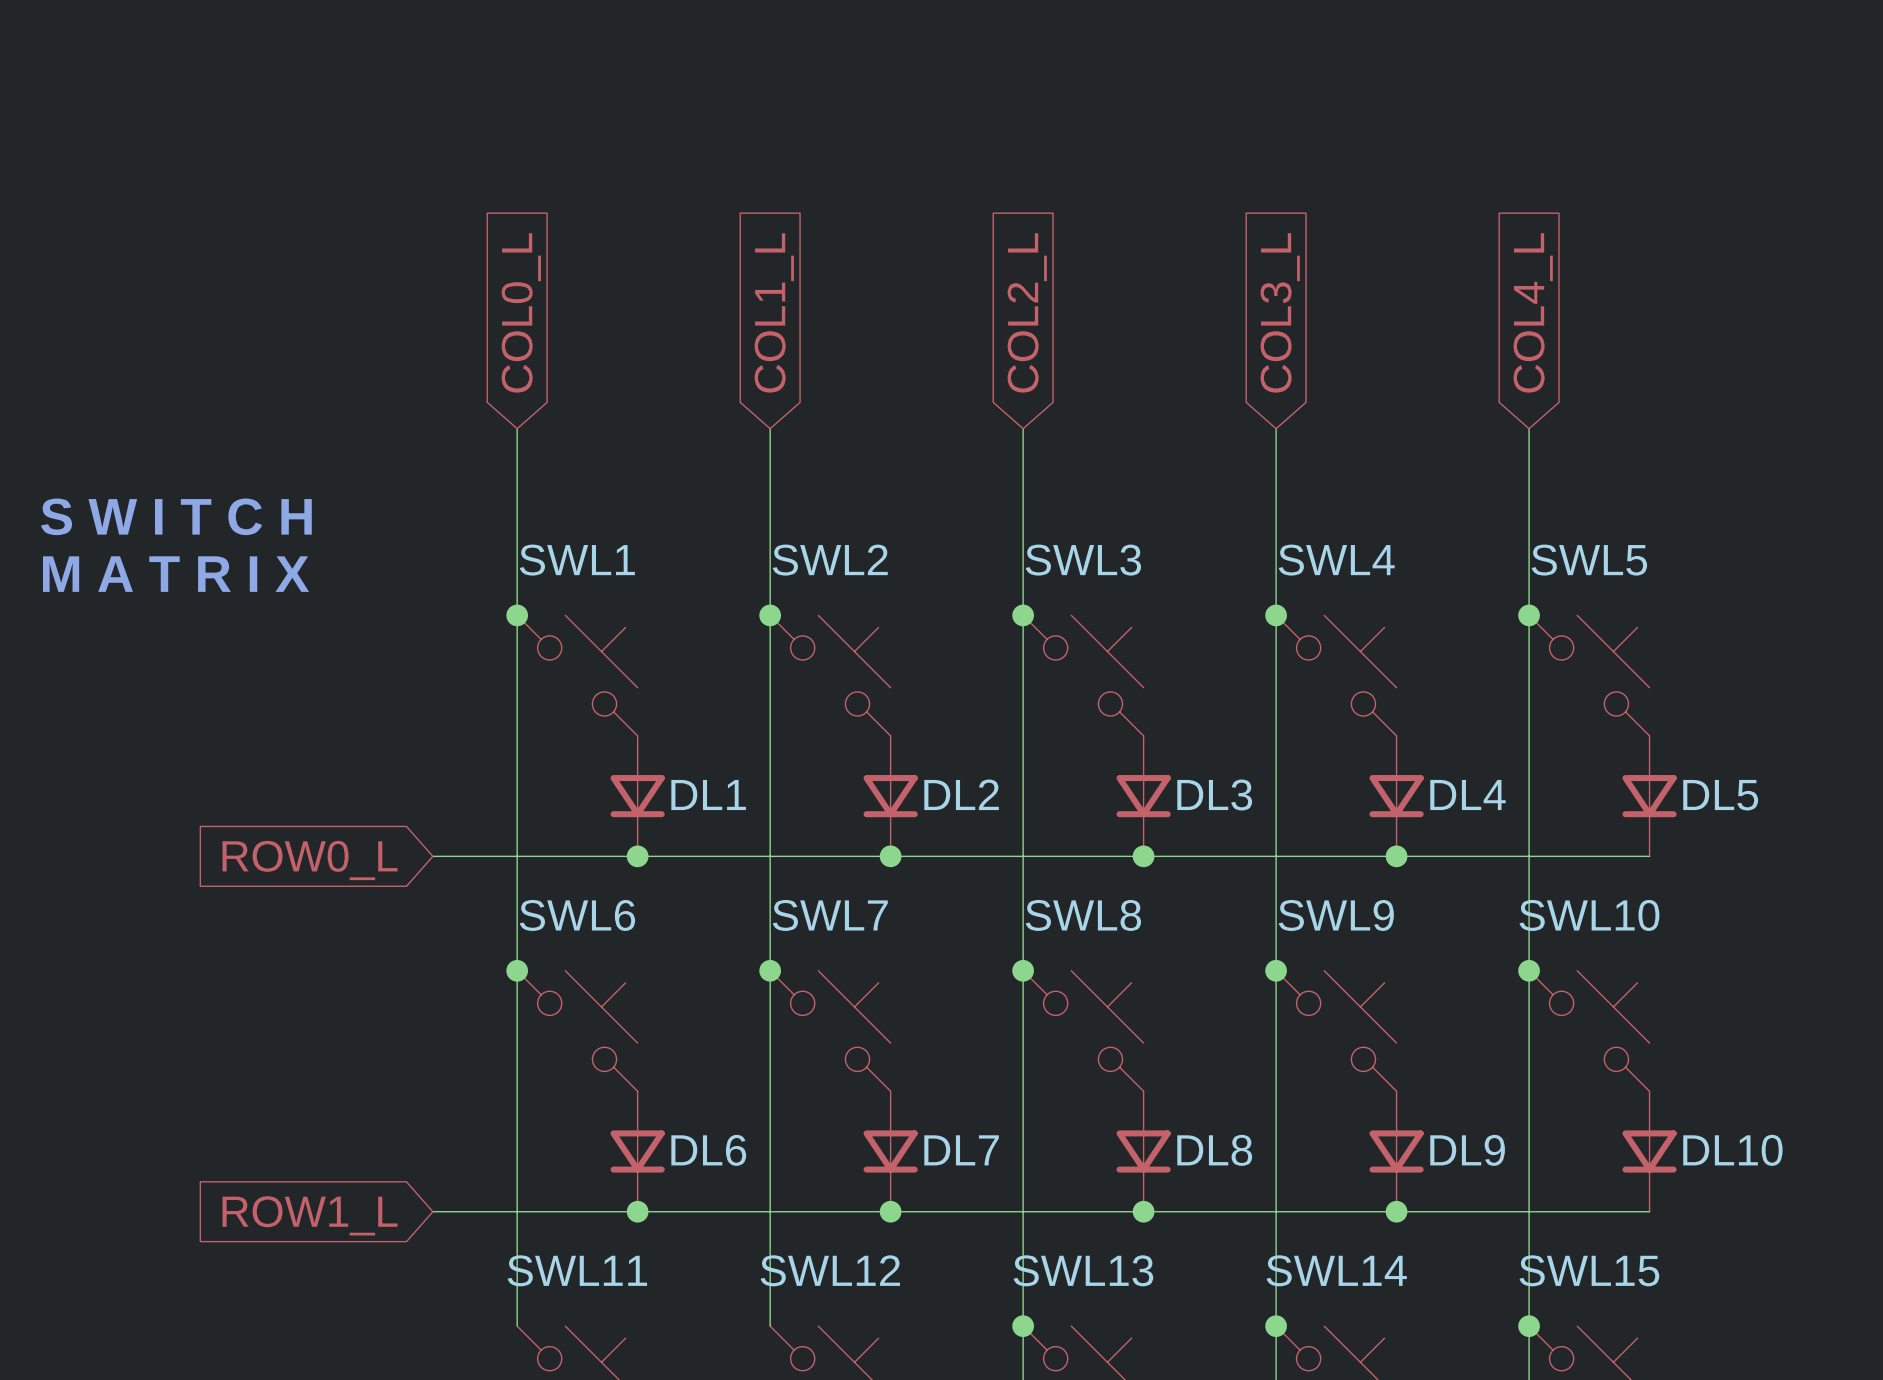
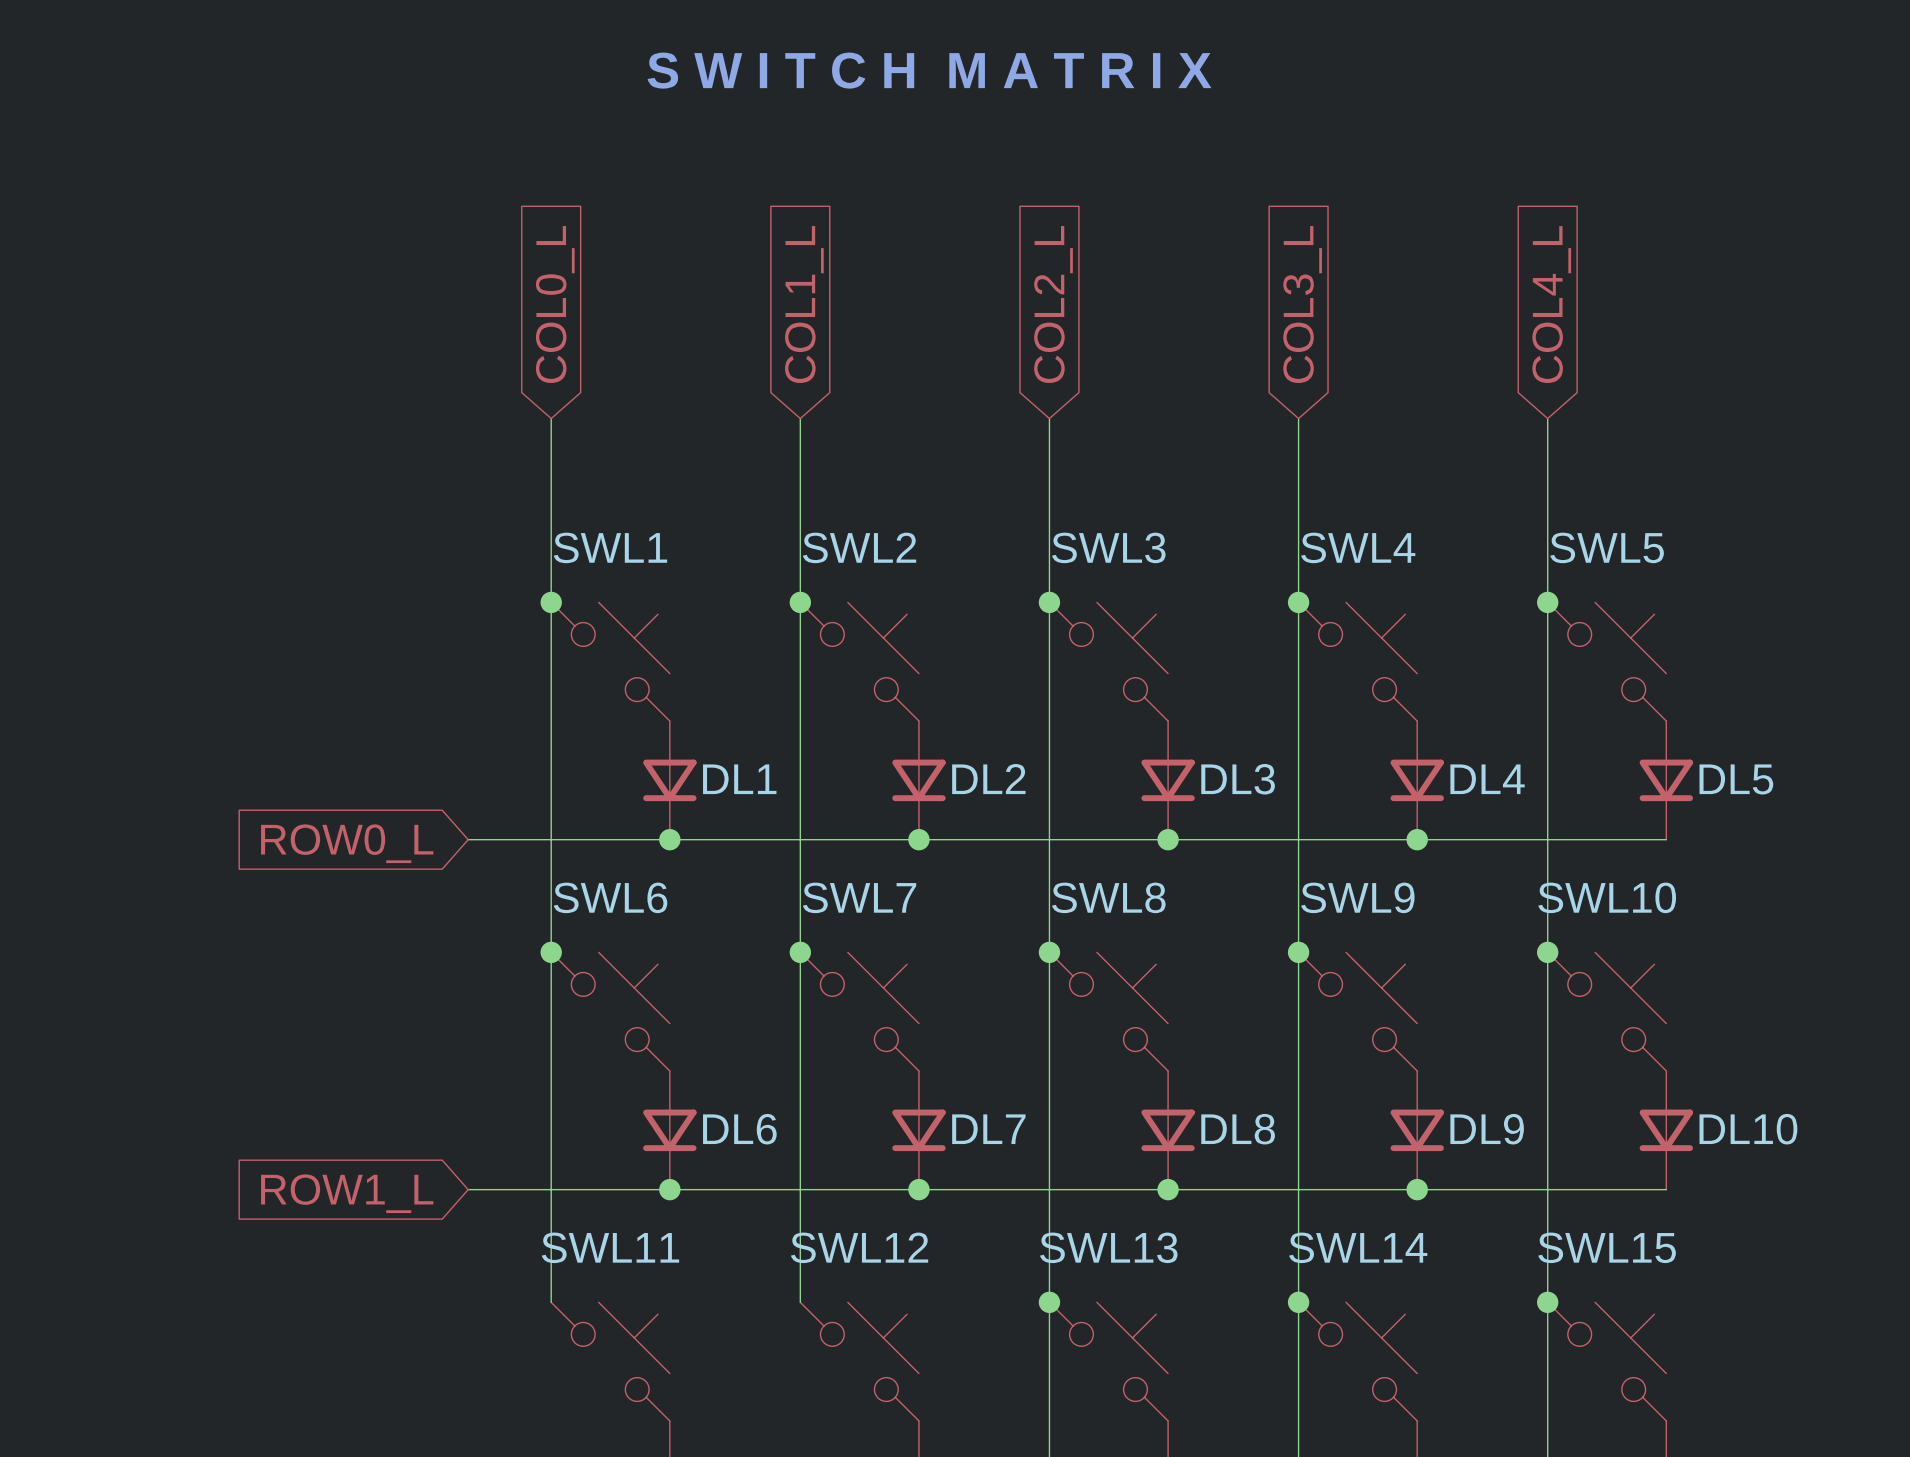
text: none -> S W I T C H M A T R I X (929, 70)
text: S W I T C H (176, 516) -> none
text: M A T R I X (176, 574) -> none

